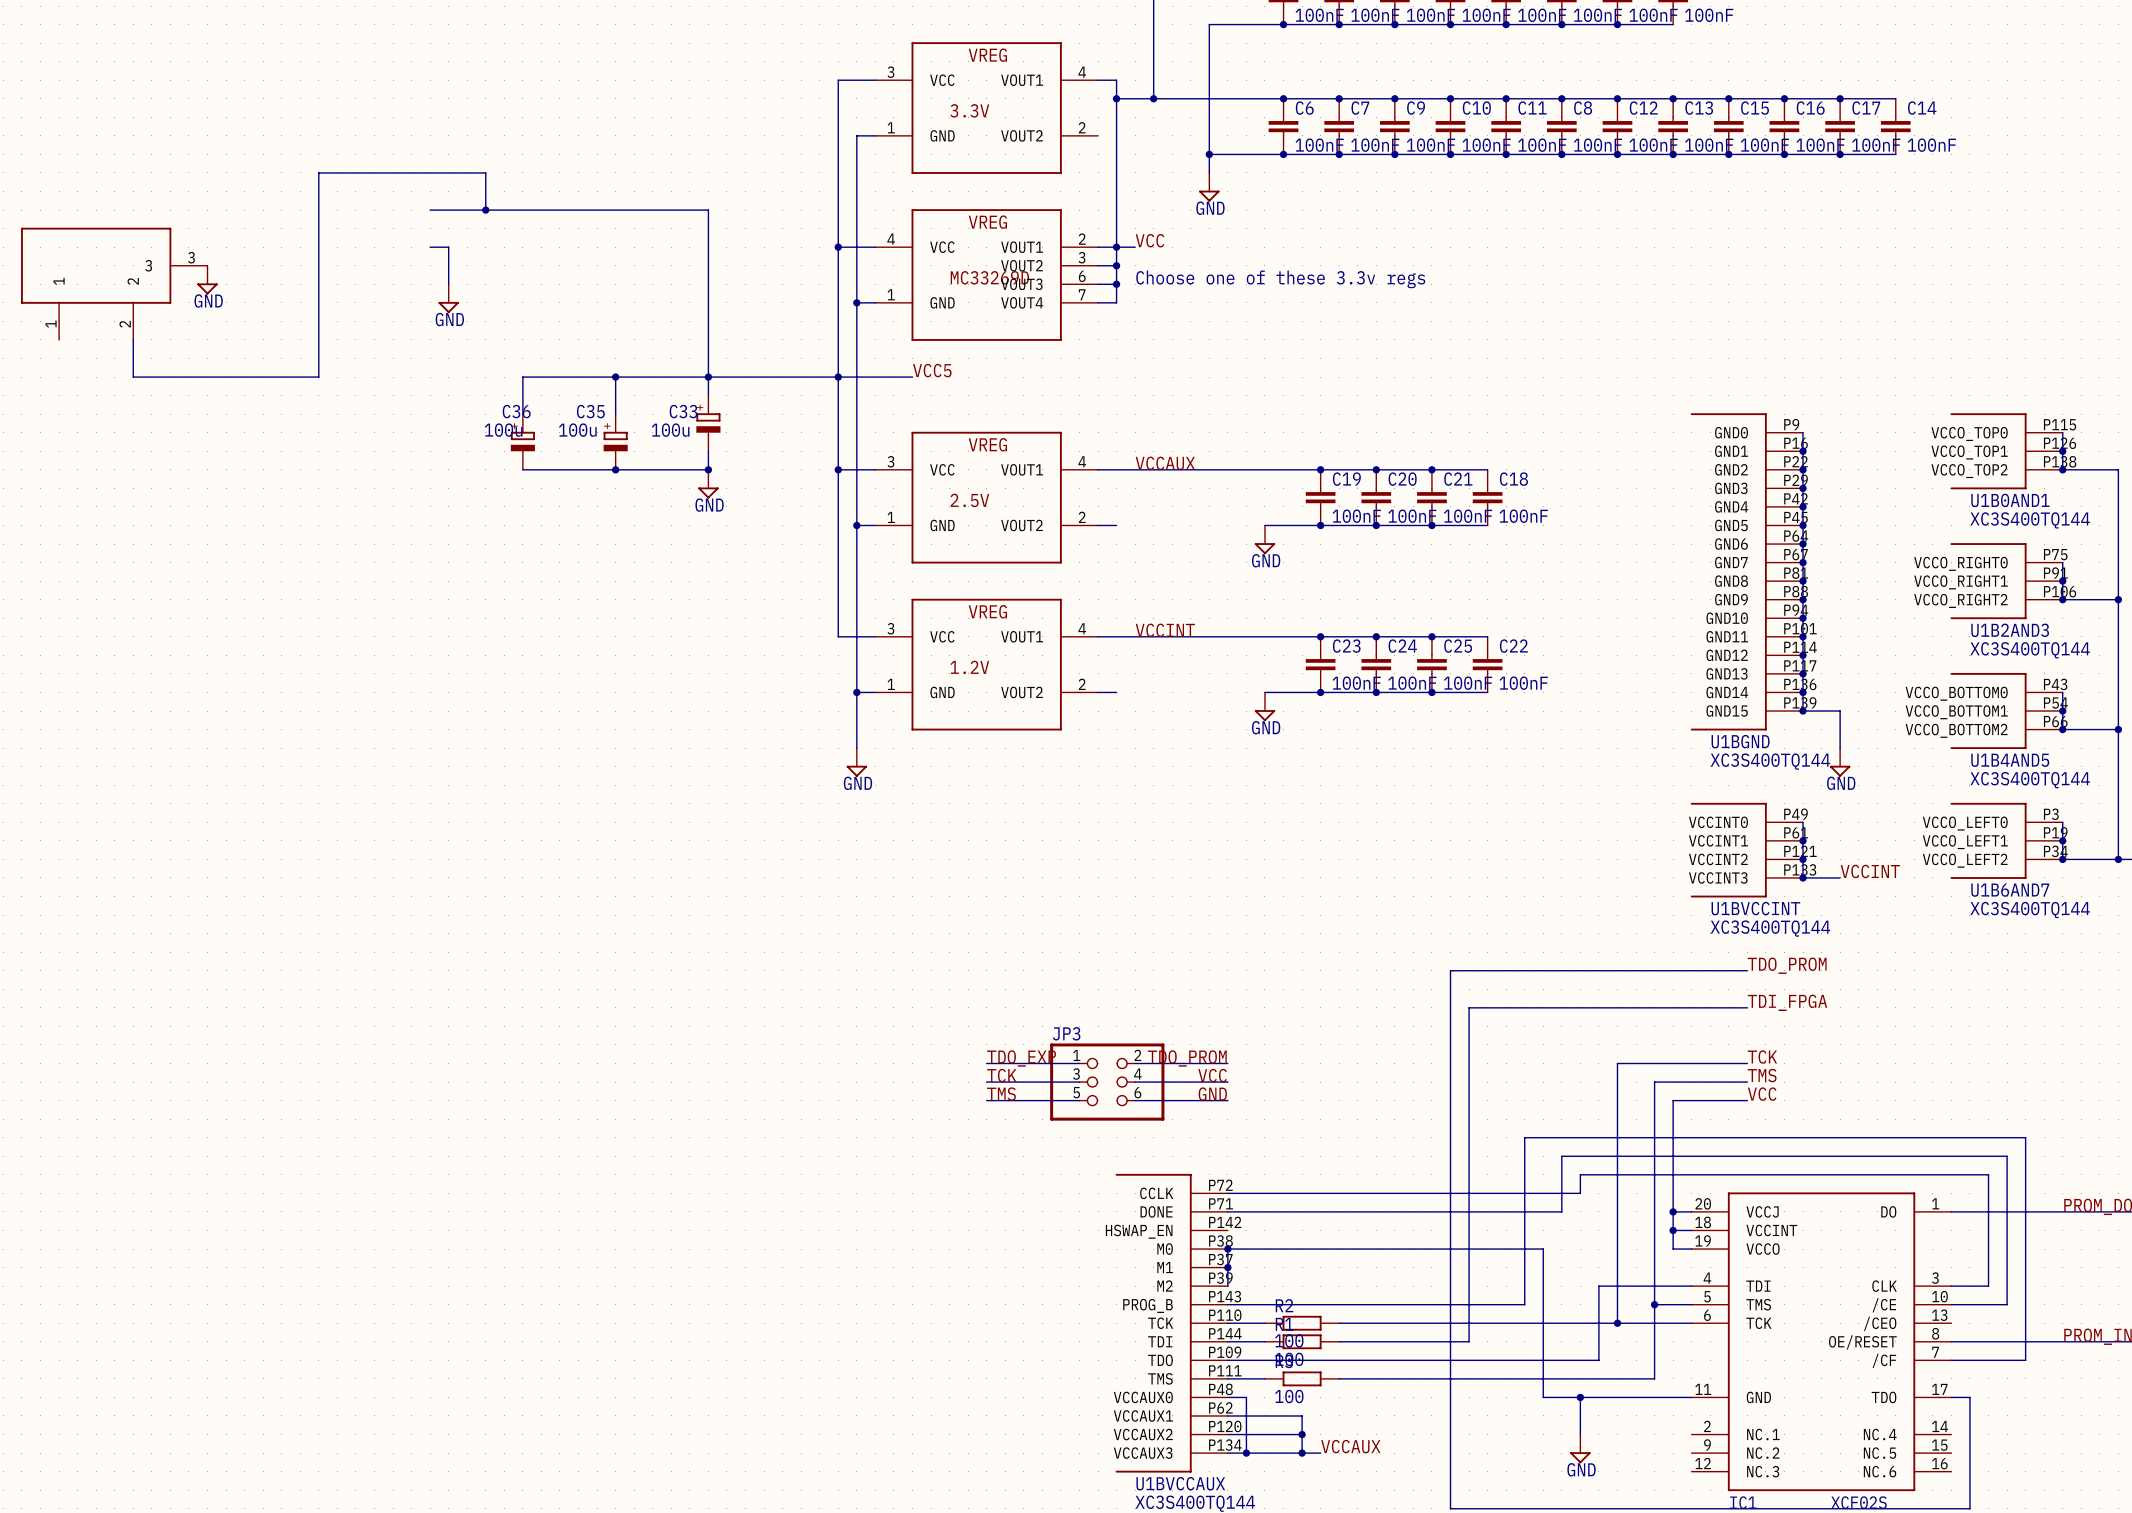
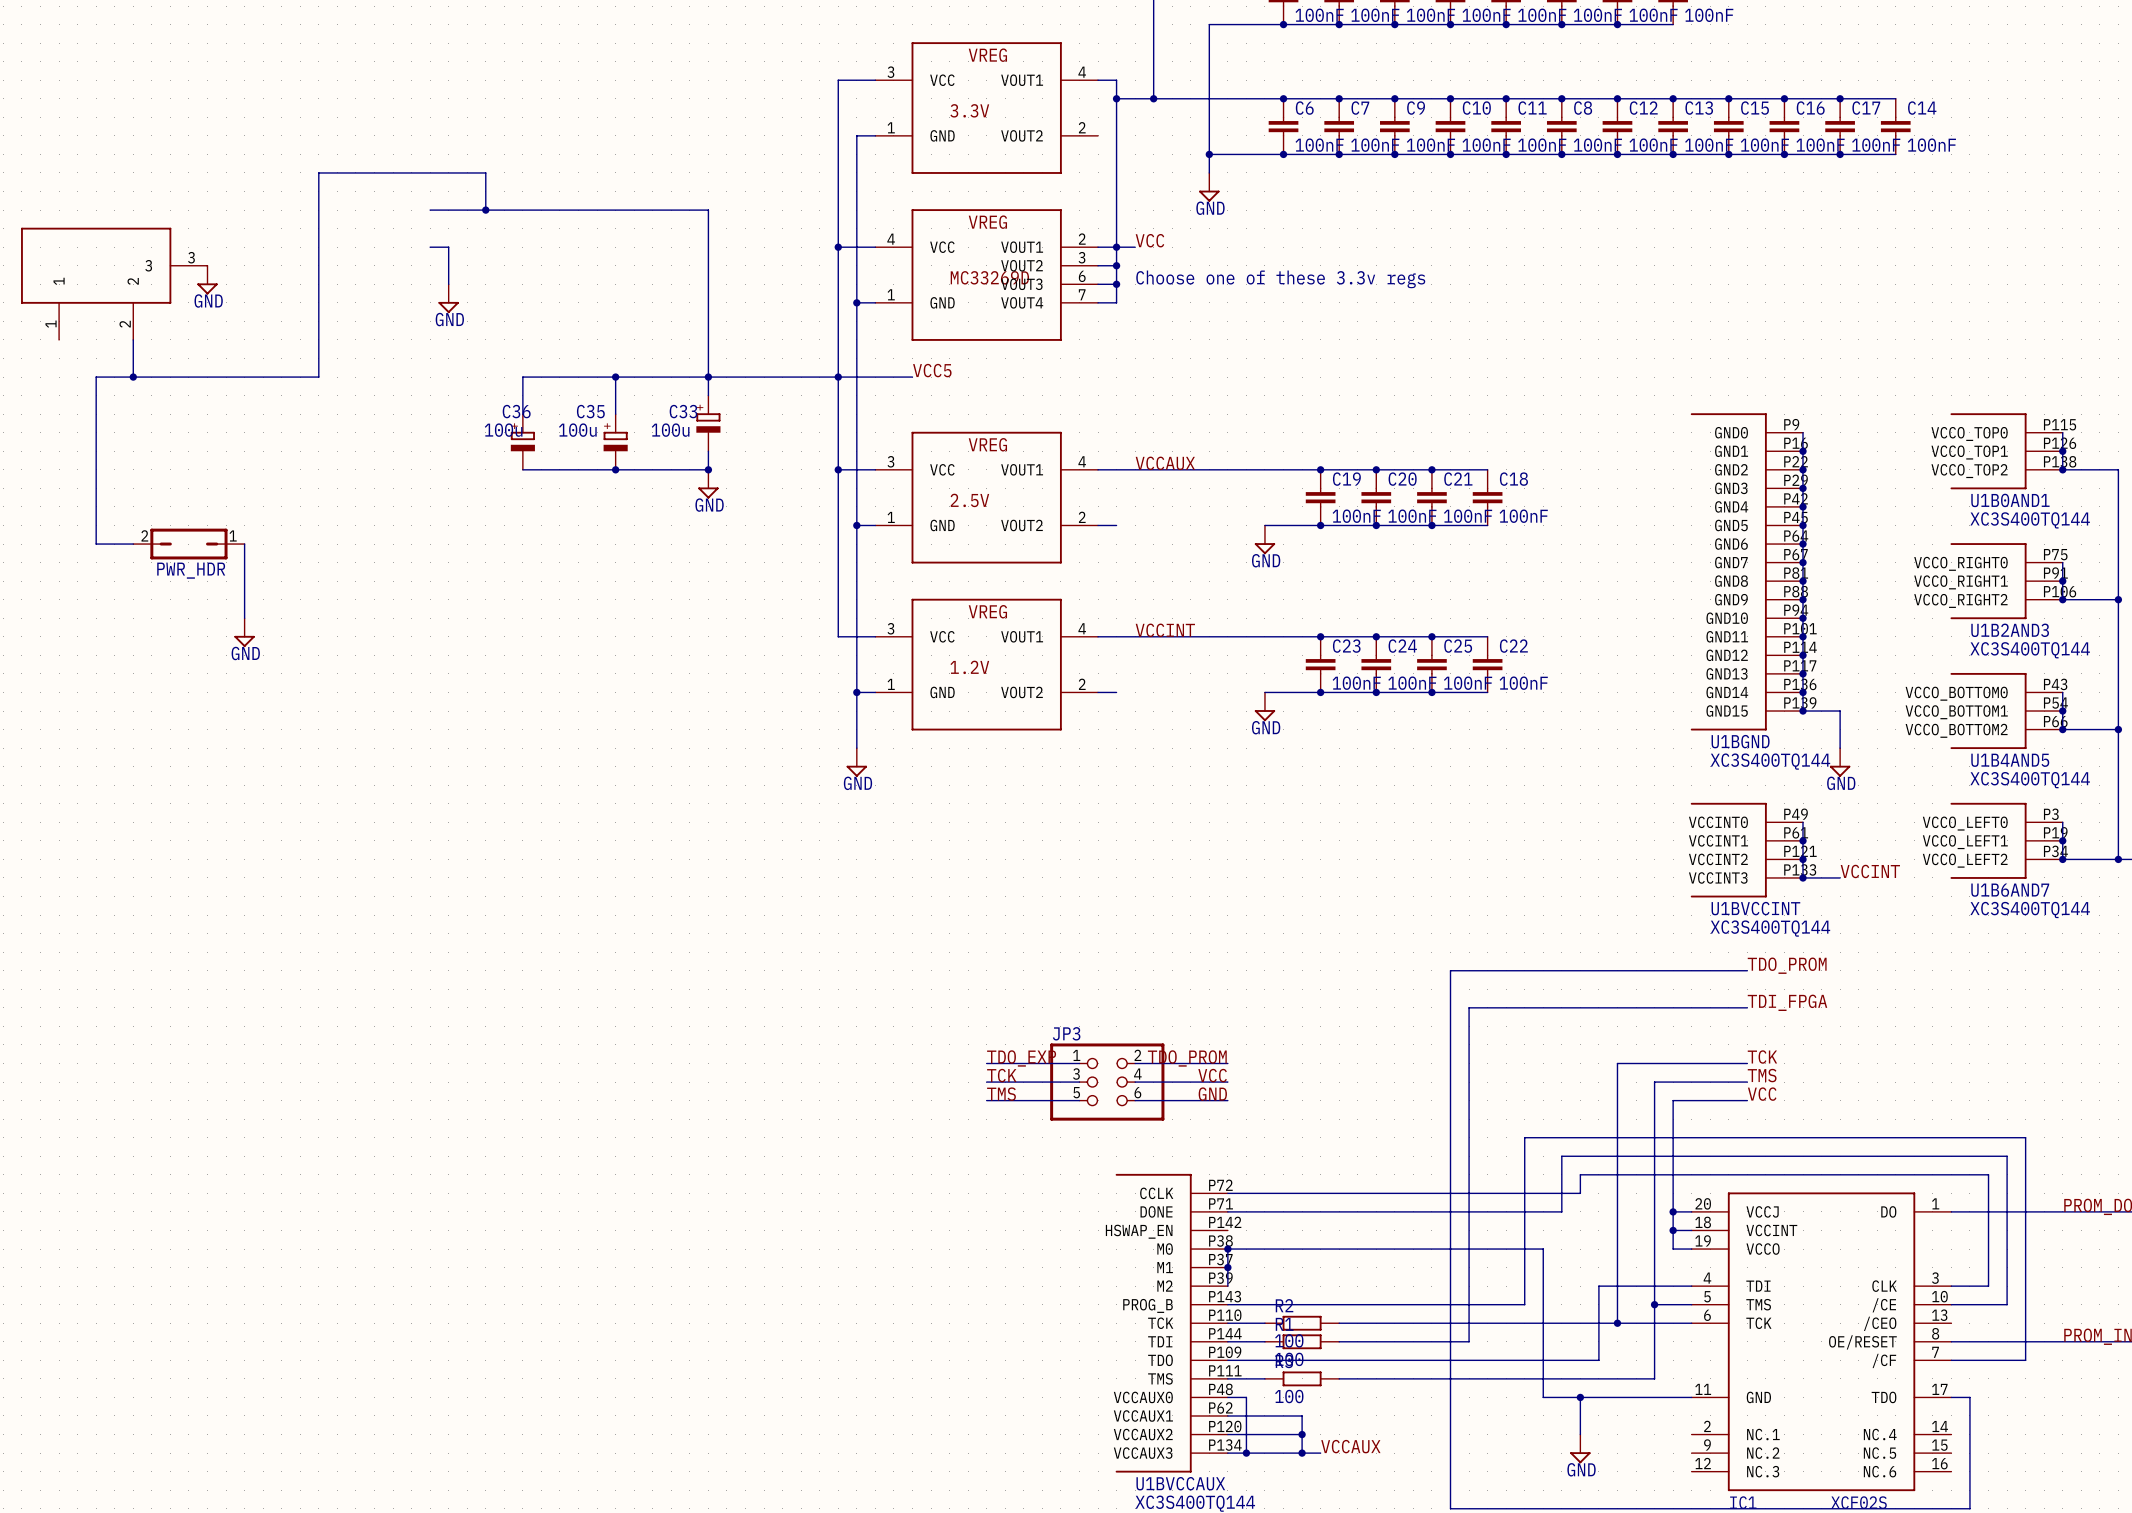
wire: none -> (133, 377) (96, 377) (96, 544) (133, 544)
junction: none -> (133, 377)
PWR_HDR: none -> (188, 544)
wire: none -> (244, 544) (244, 618)
power symbol: none -> GND (244, 632)

